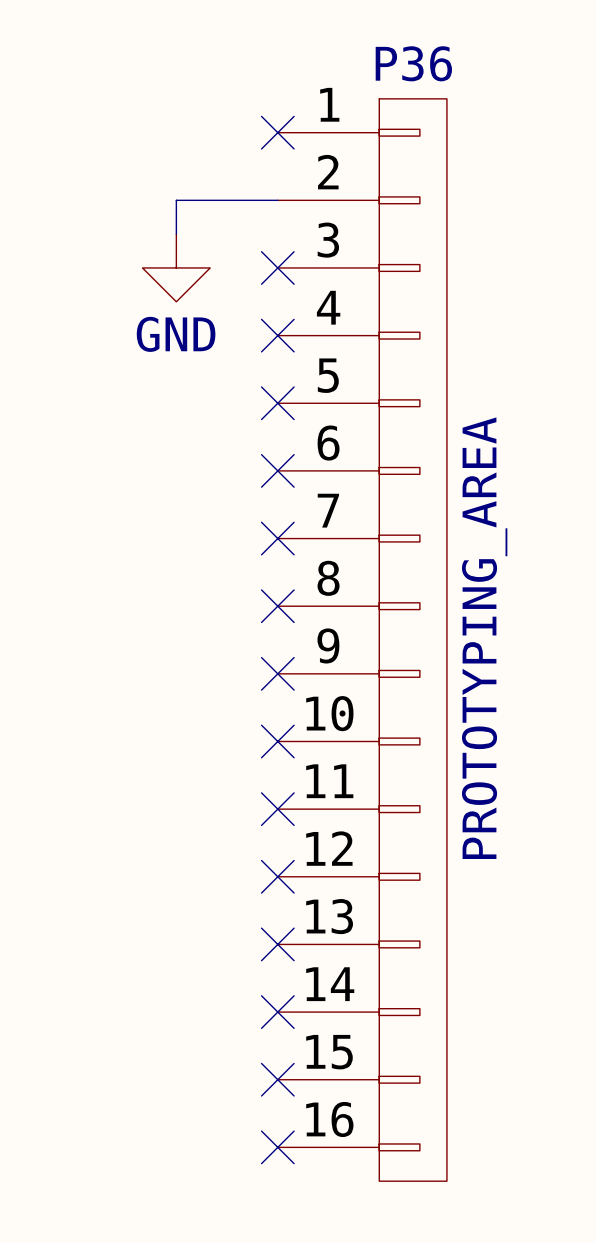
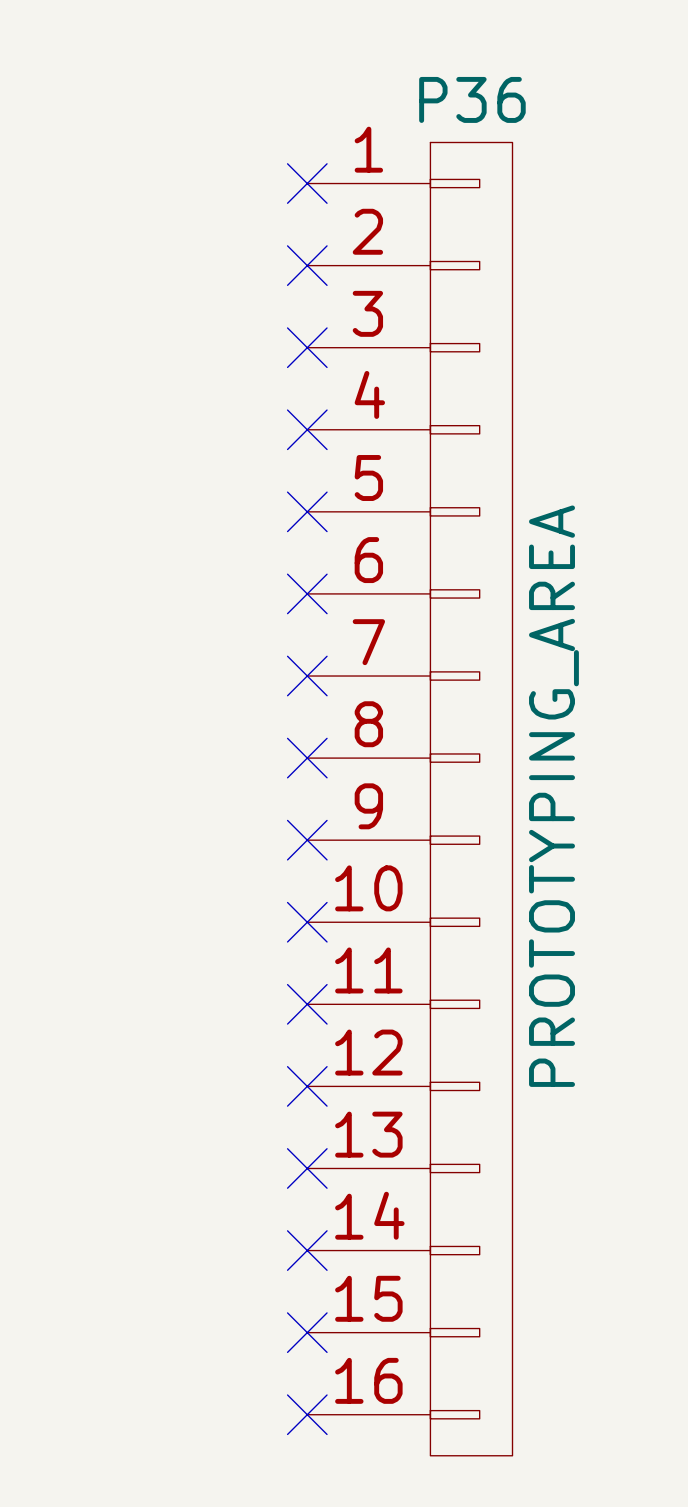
wire: (277, 200) (176, 200) (176, 234) -> none
no-connect mark: none -> (307, 265)
power symbol: GND (176, 267) -> none

